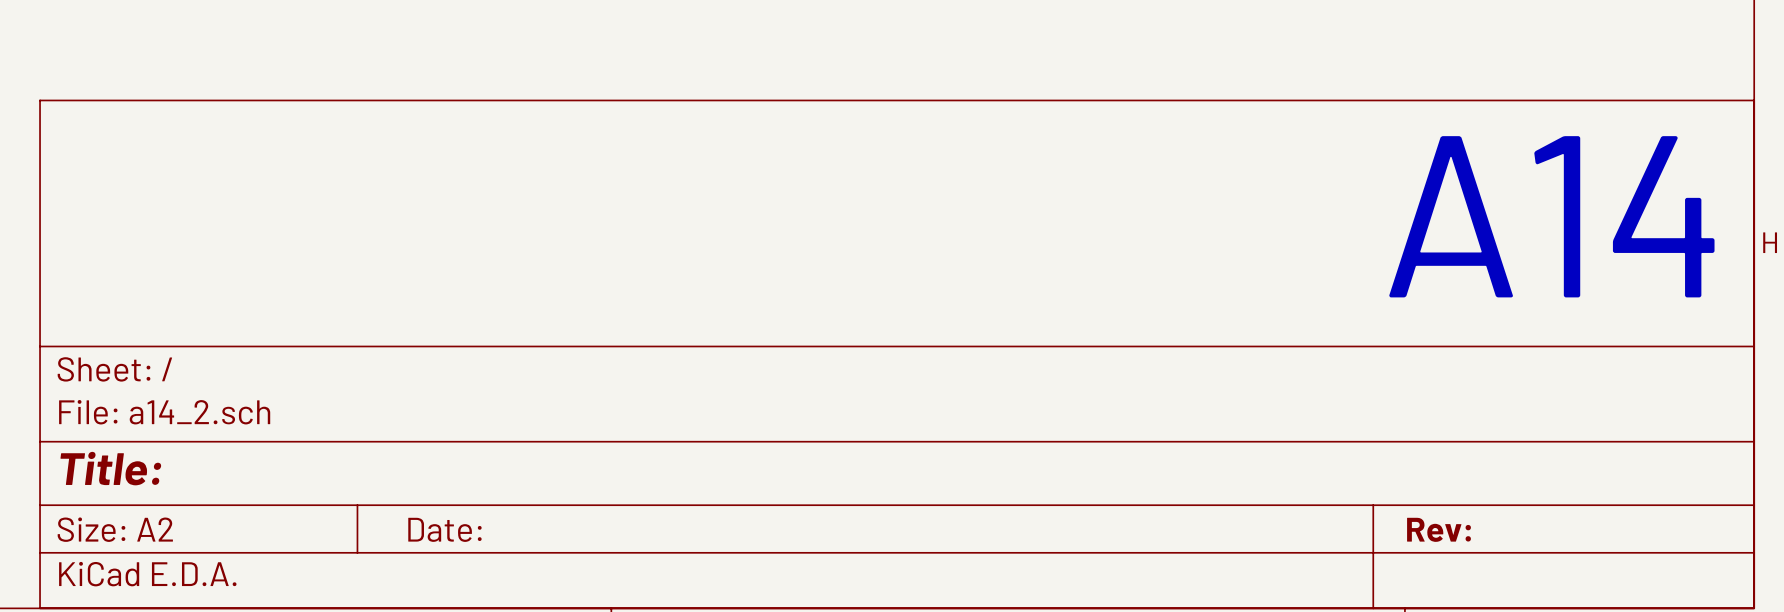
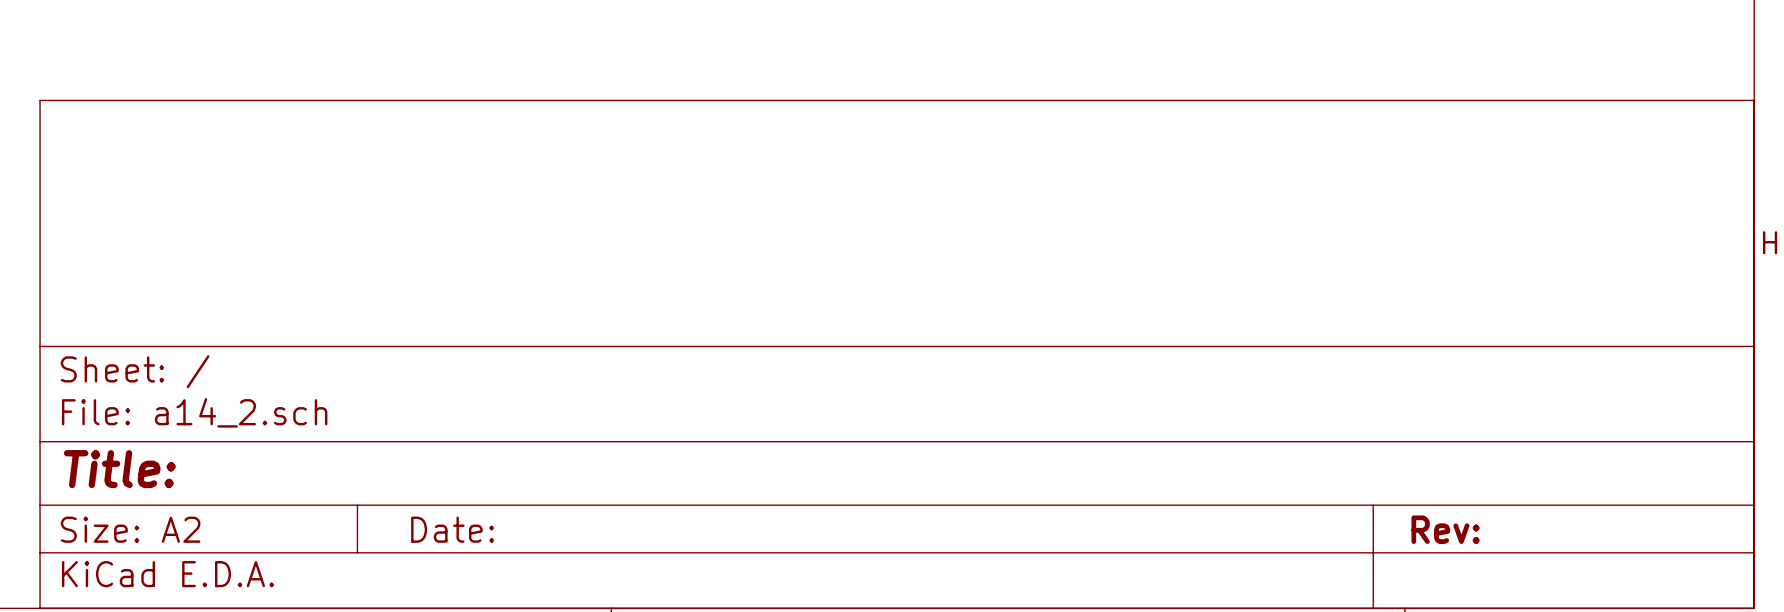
text: A14 (1551, 216) -> none

